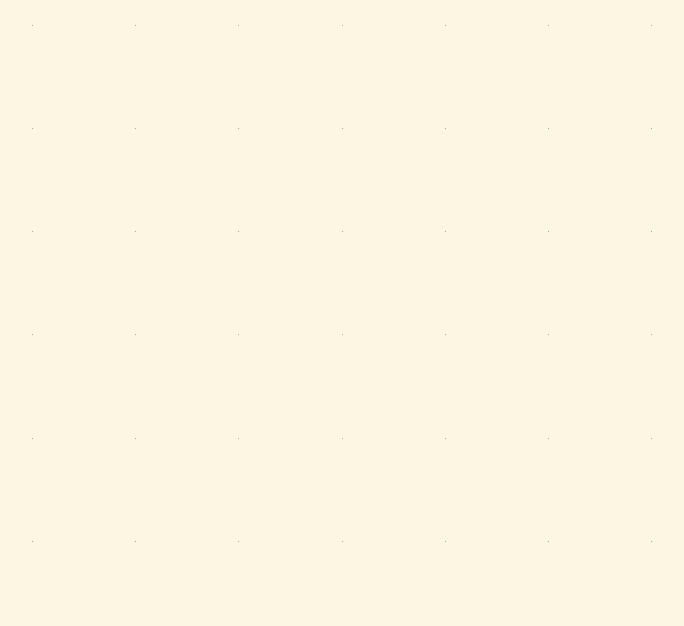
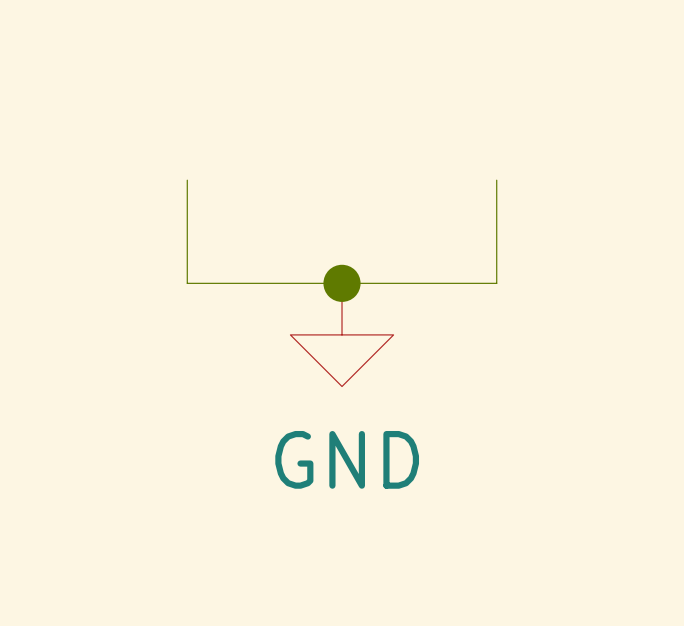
wire: none -> (187, 180) (187, 283) (496, 283) (496, 180)
junction: none -> (342, 283)
power symbol: none -> GND (342, 334)

